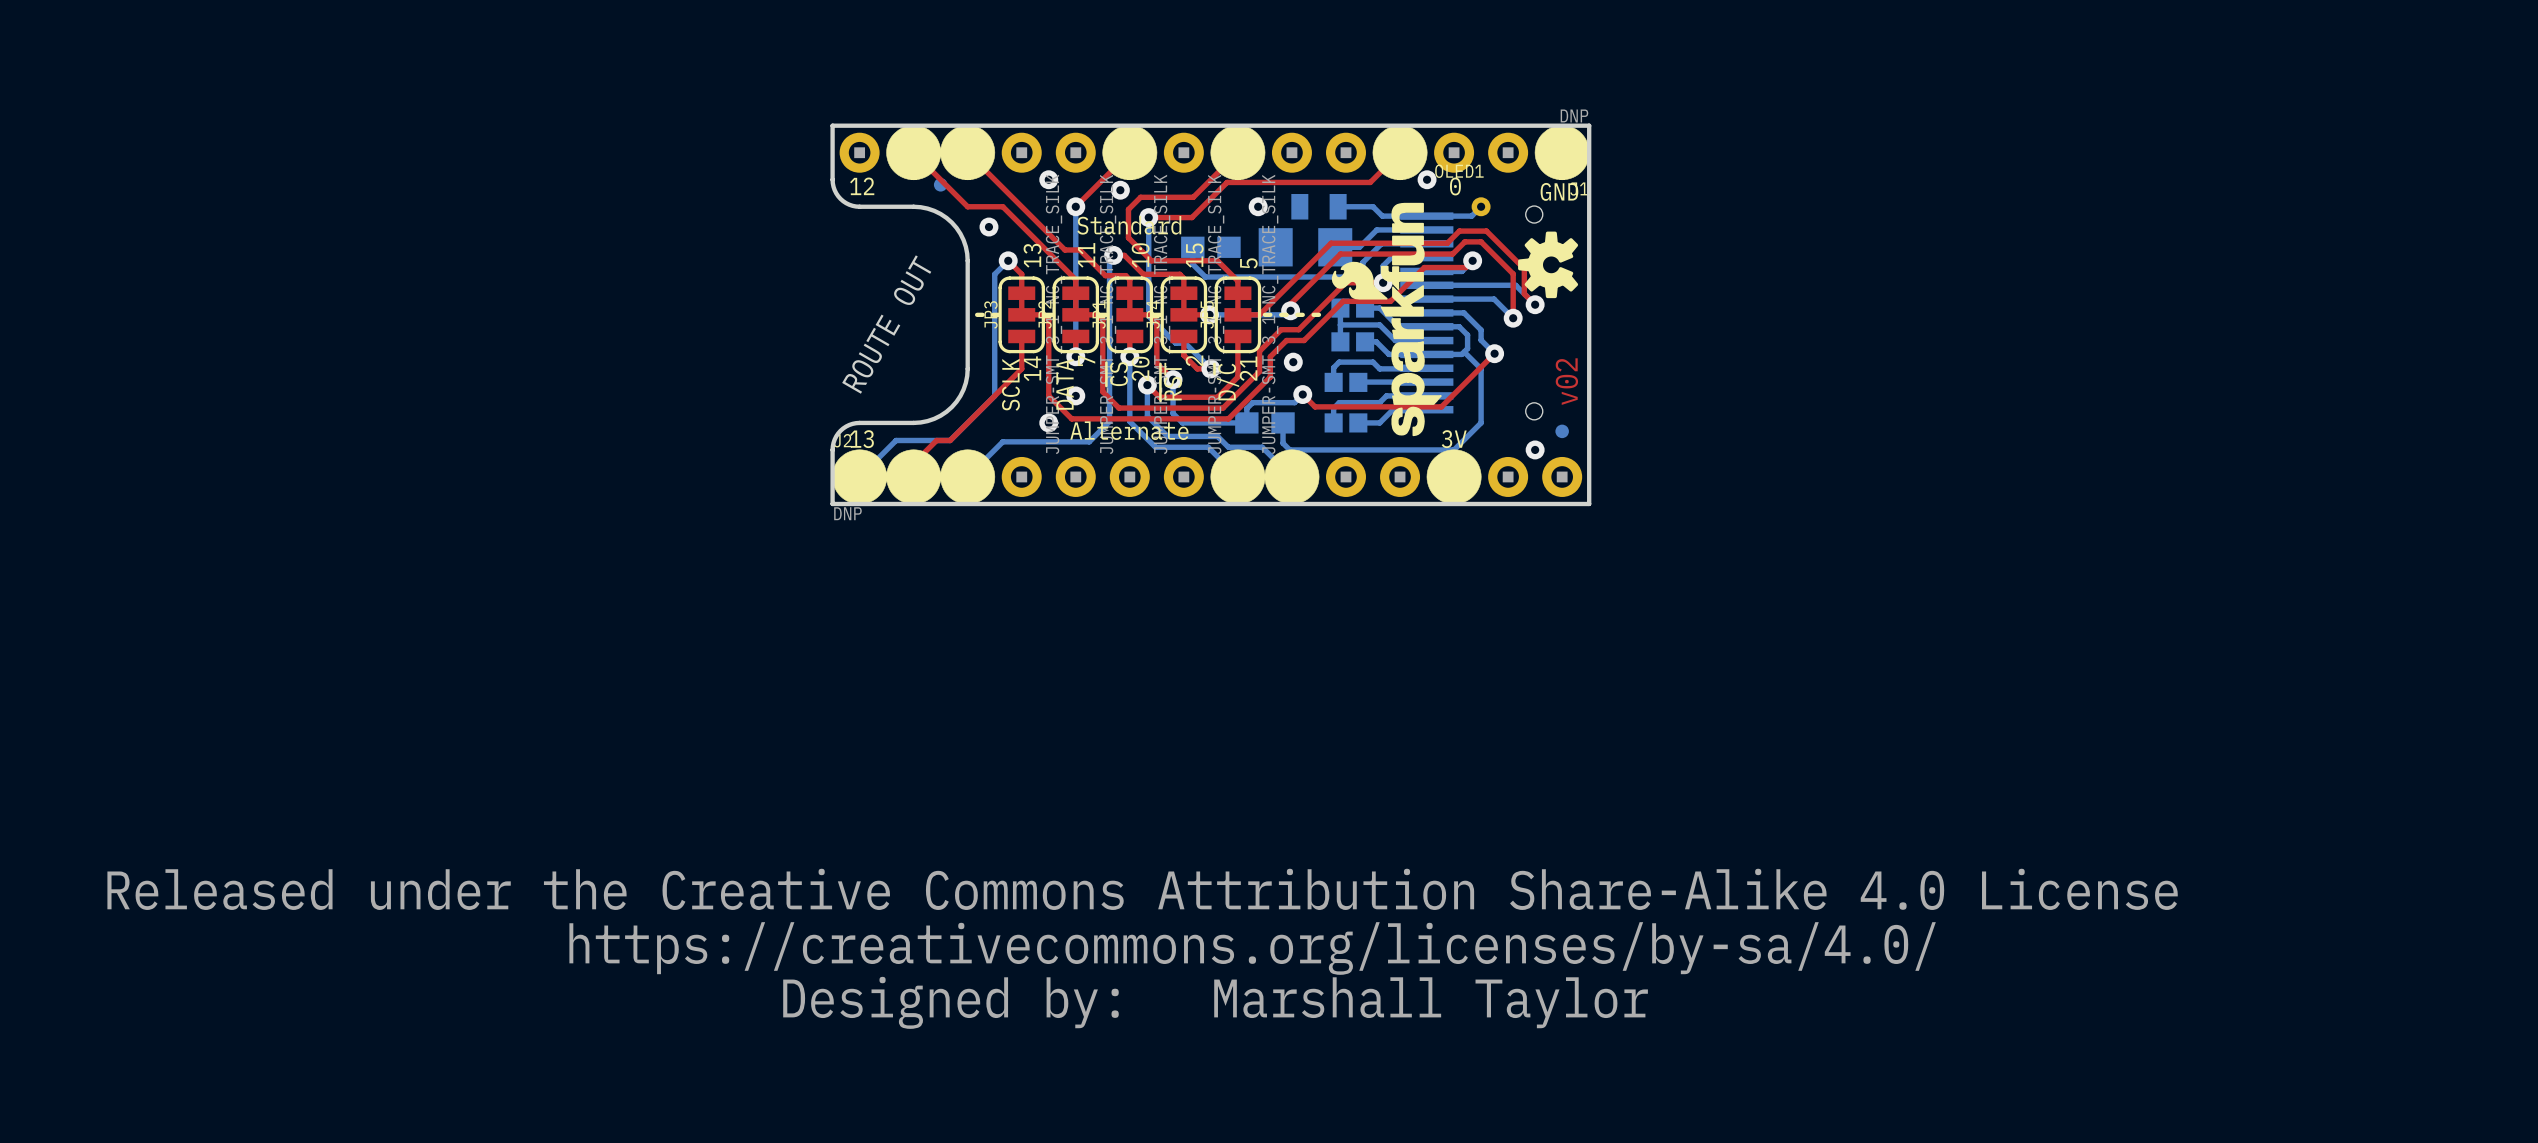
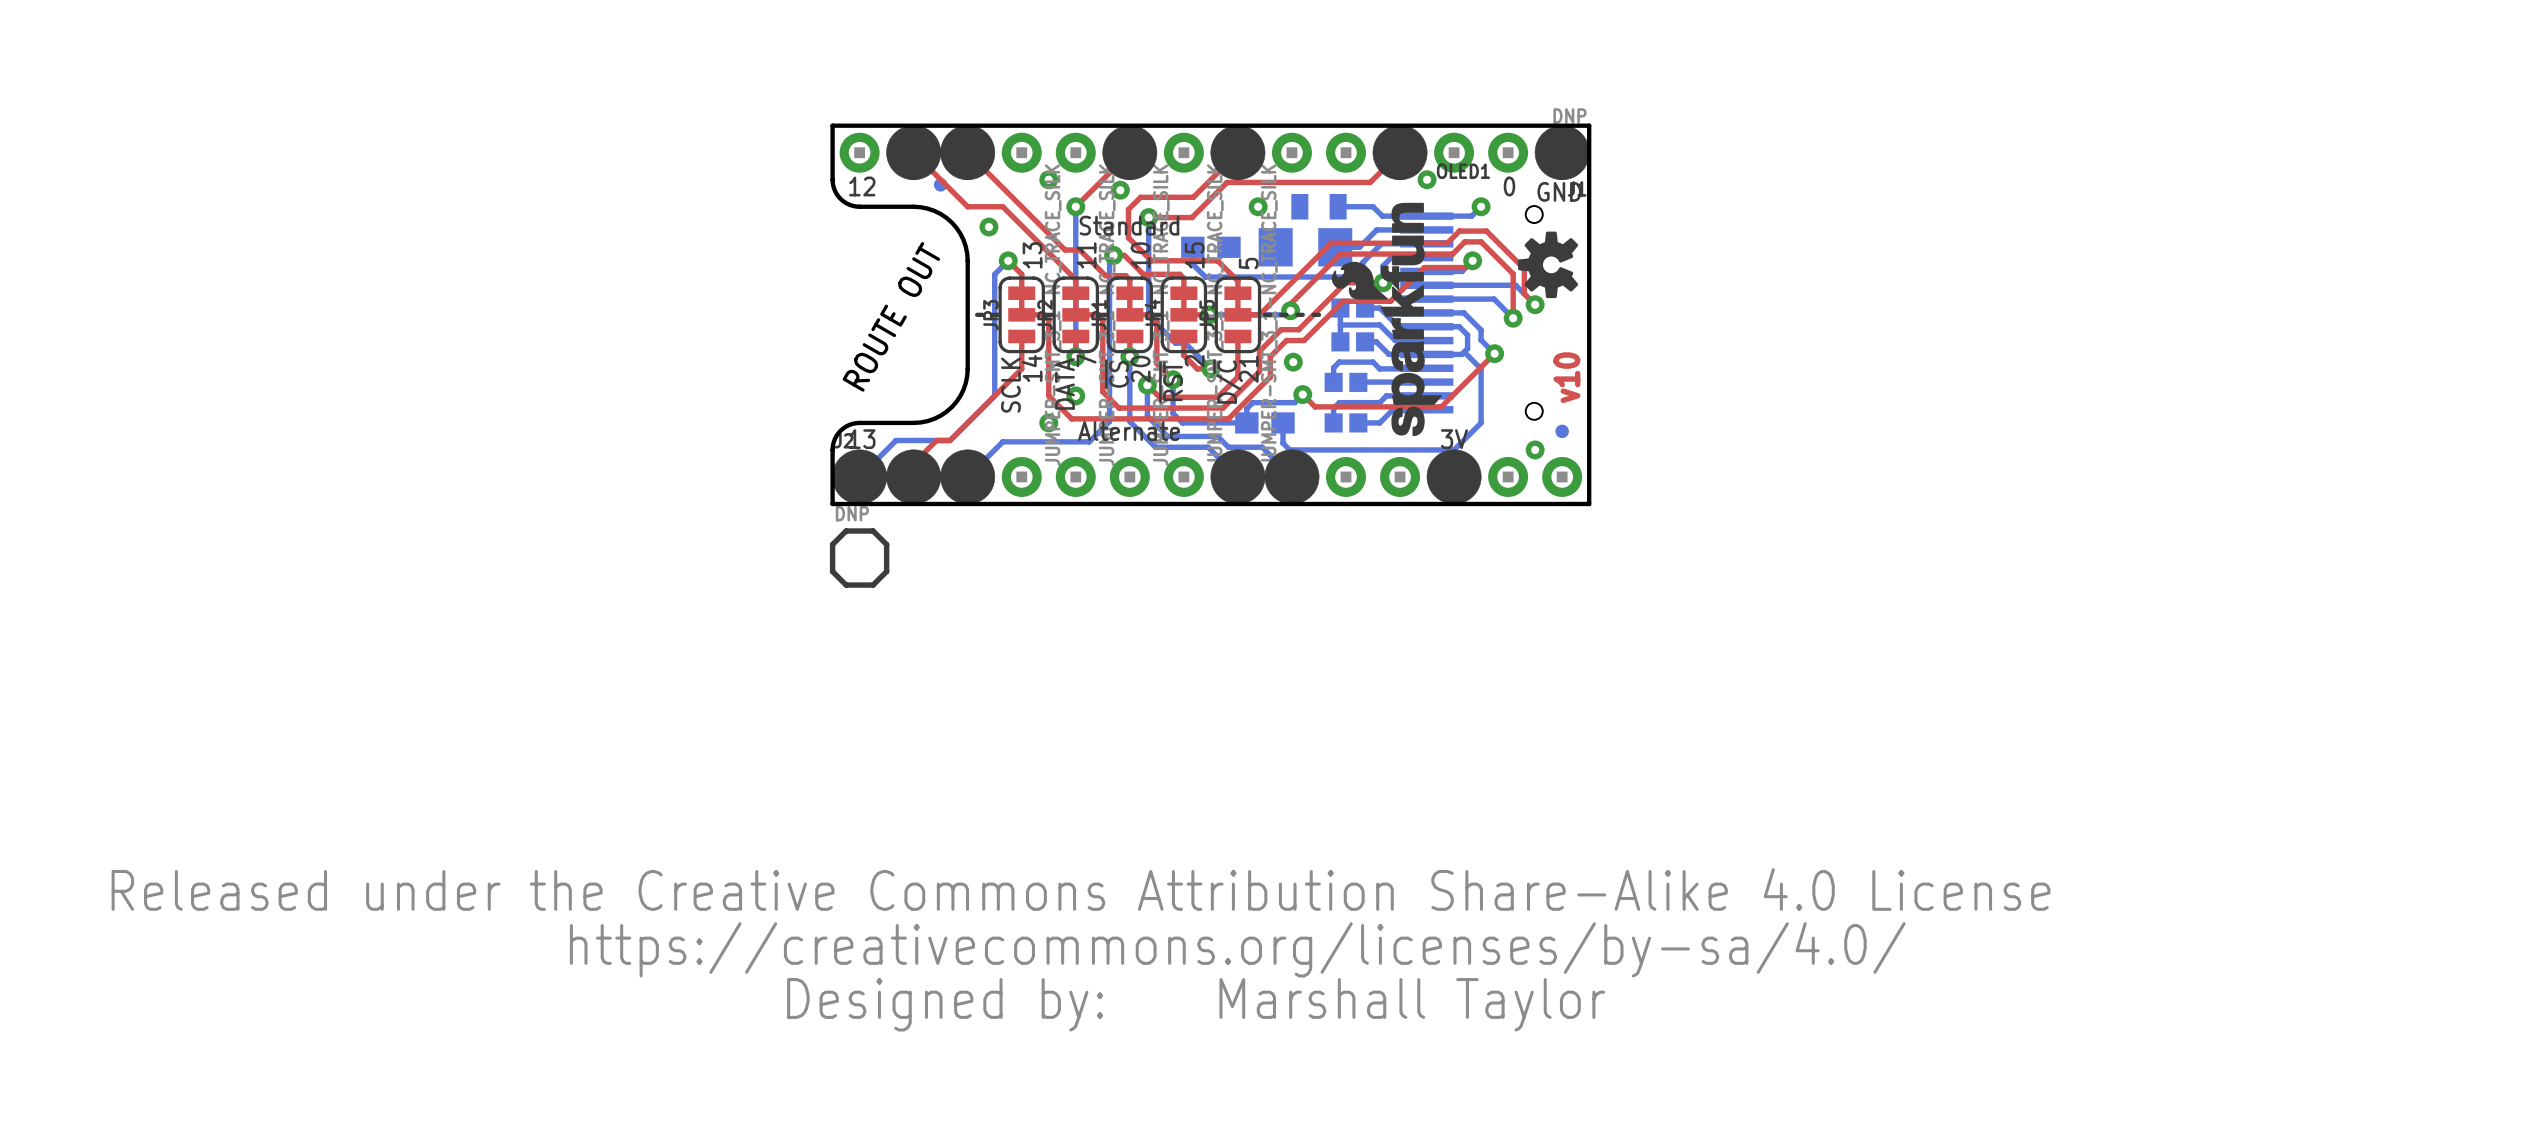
text position: 0 (1455, 186) -> 0 (1509, 186)
text: v02 (1566, 381) -> v10 (1566, 377)
line: none -> (846, 531) (832, 544) (832, 571) (846, 585) (873, 585) (886, 571) (886, 544) (873, 531) (846, 531)

